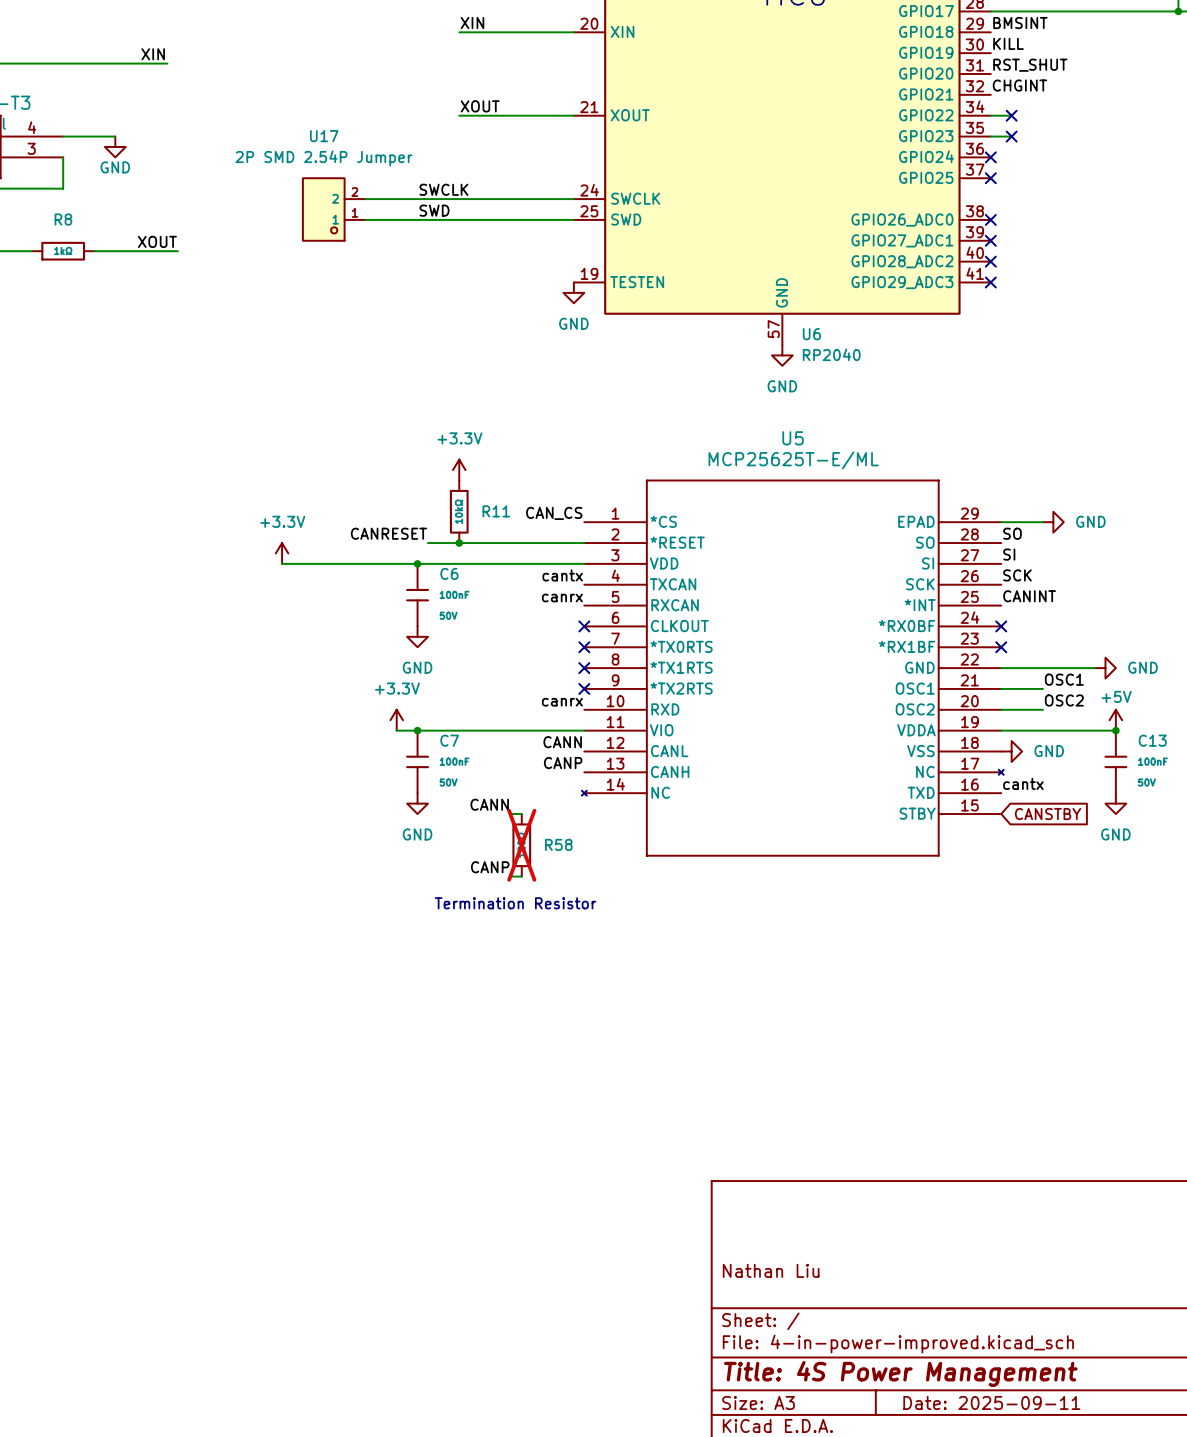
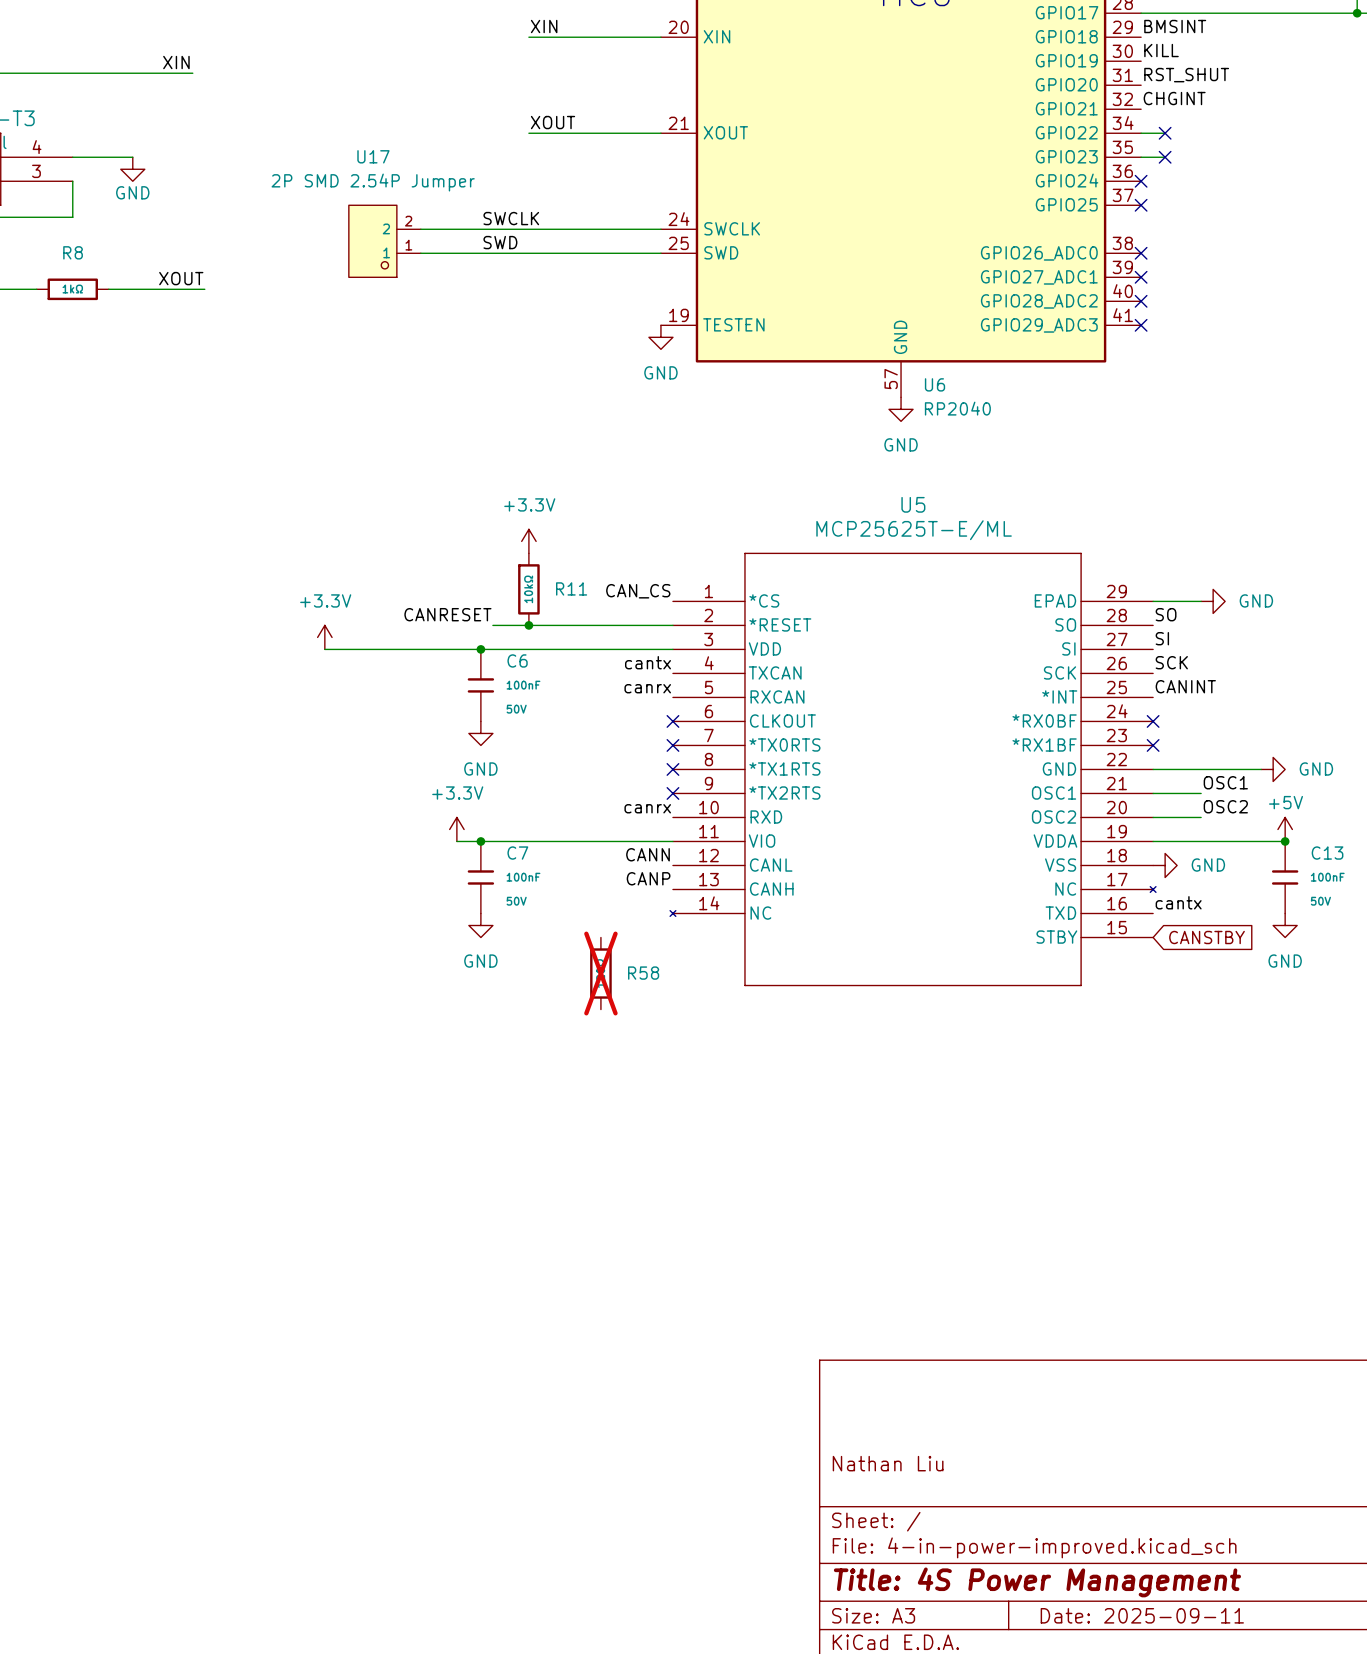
label: CANN (489, 804) -> none
wire: (511, 814) (521, 814) -> none
label: CANP (490, 867) -> none
wire: (511, 876) (521, 876) -> none
text: Termination Resistor (515, 903) -> none

